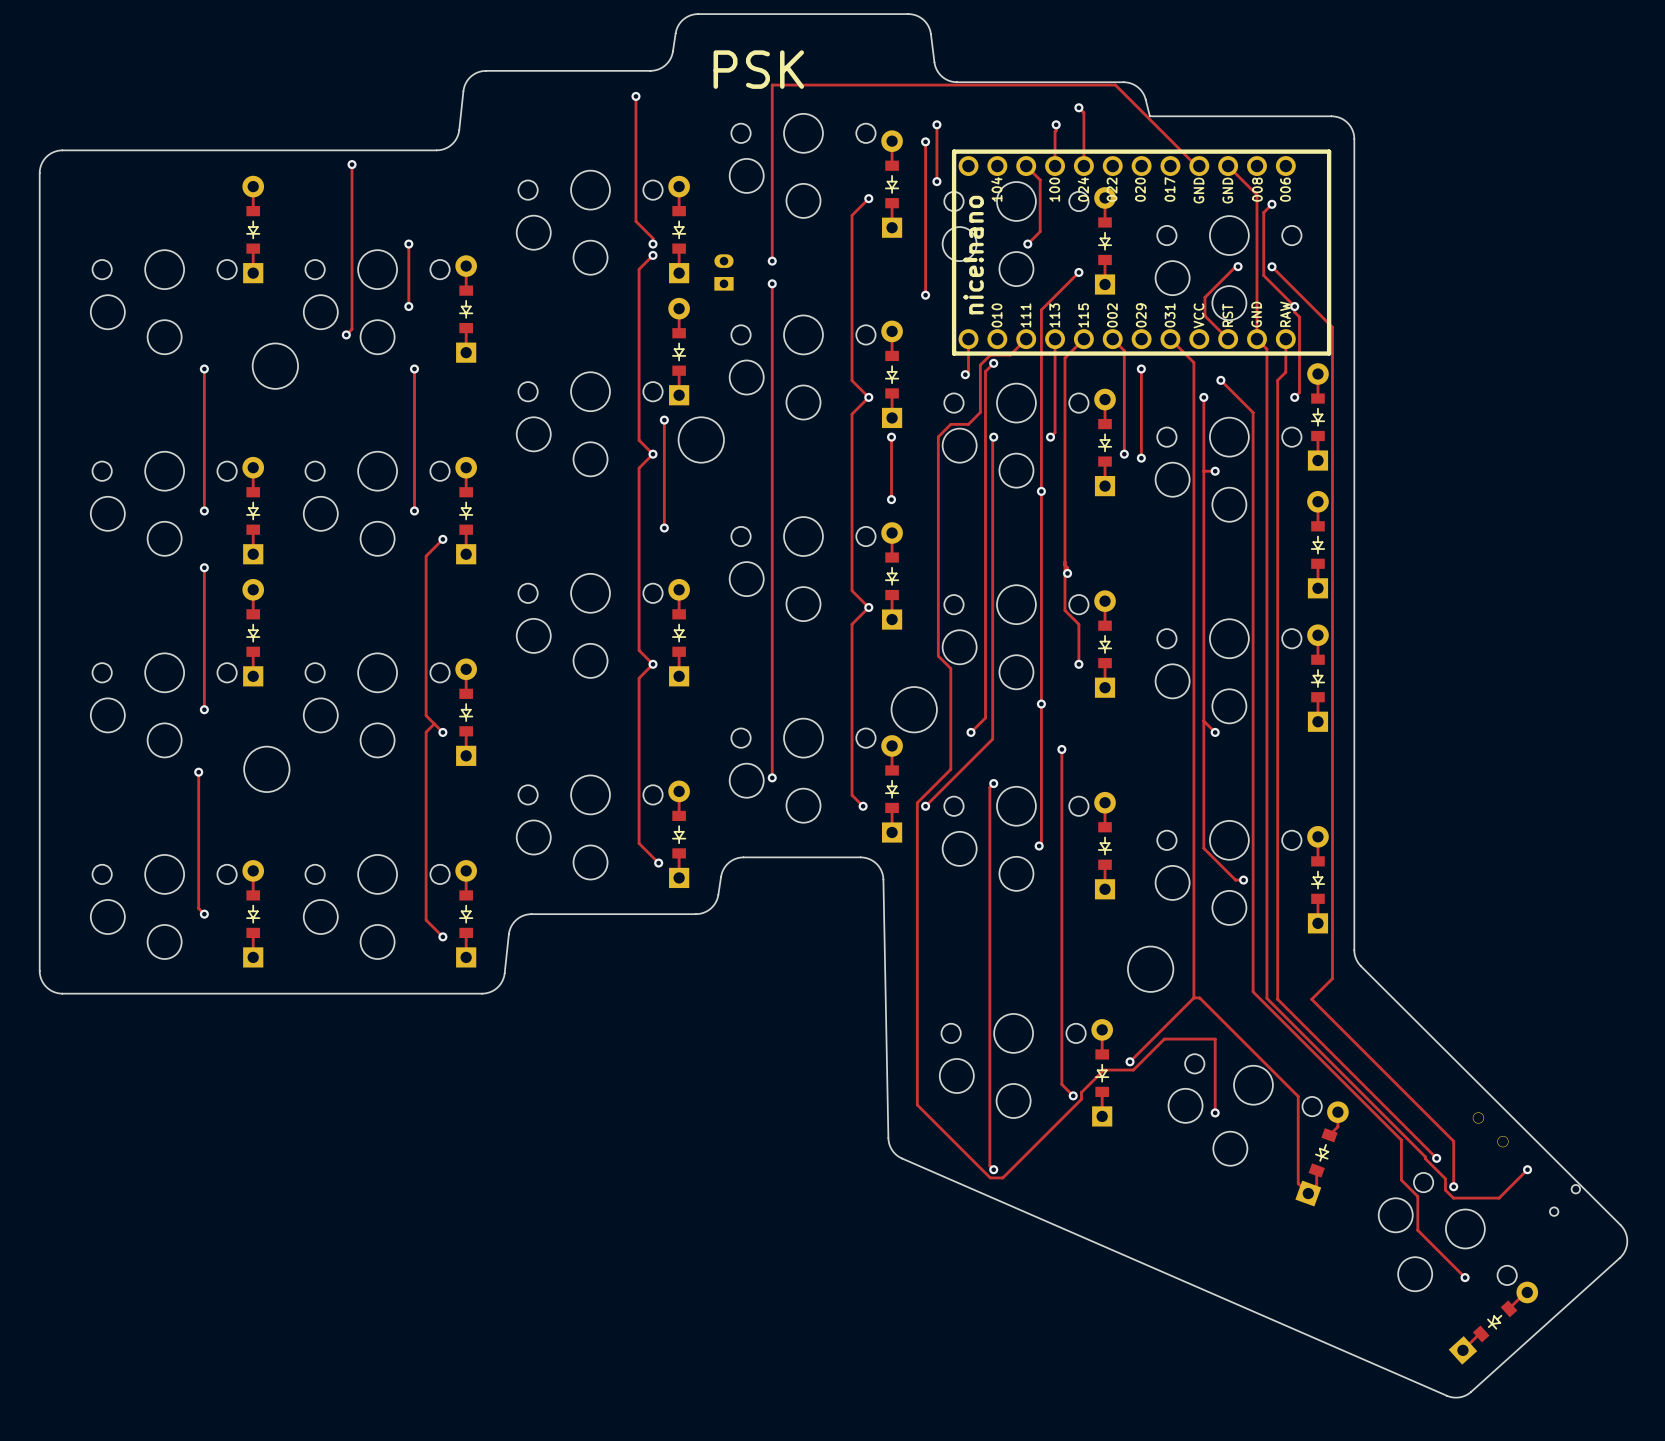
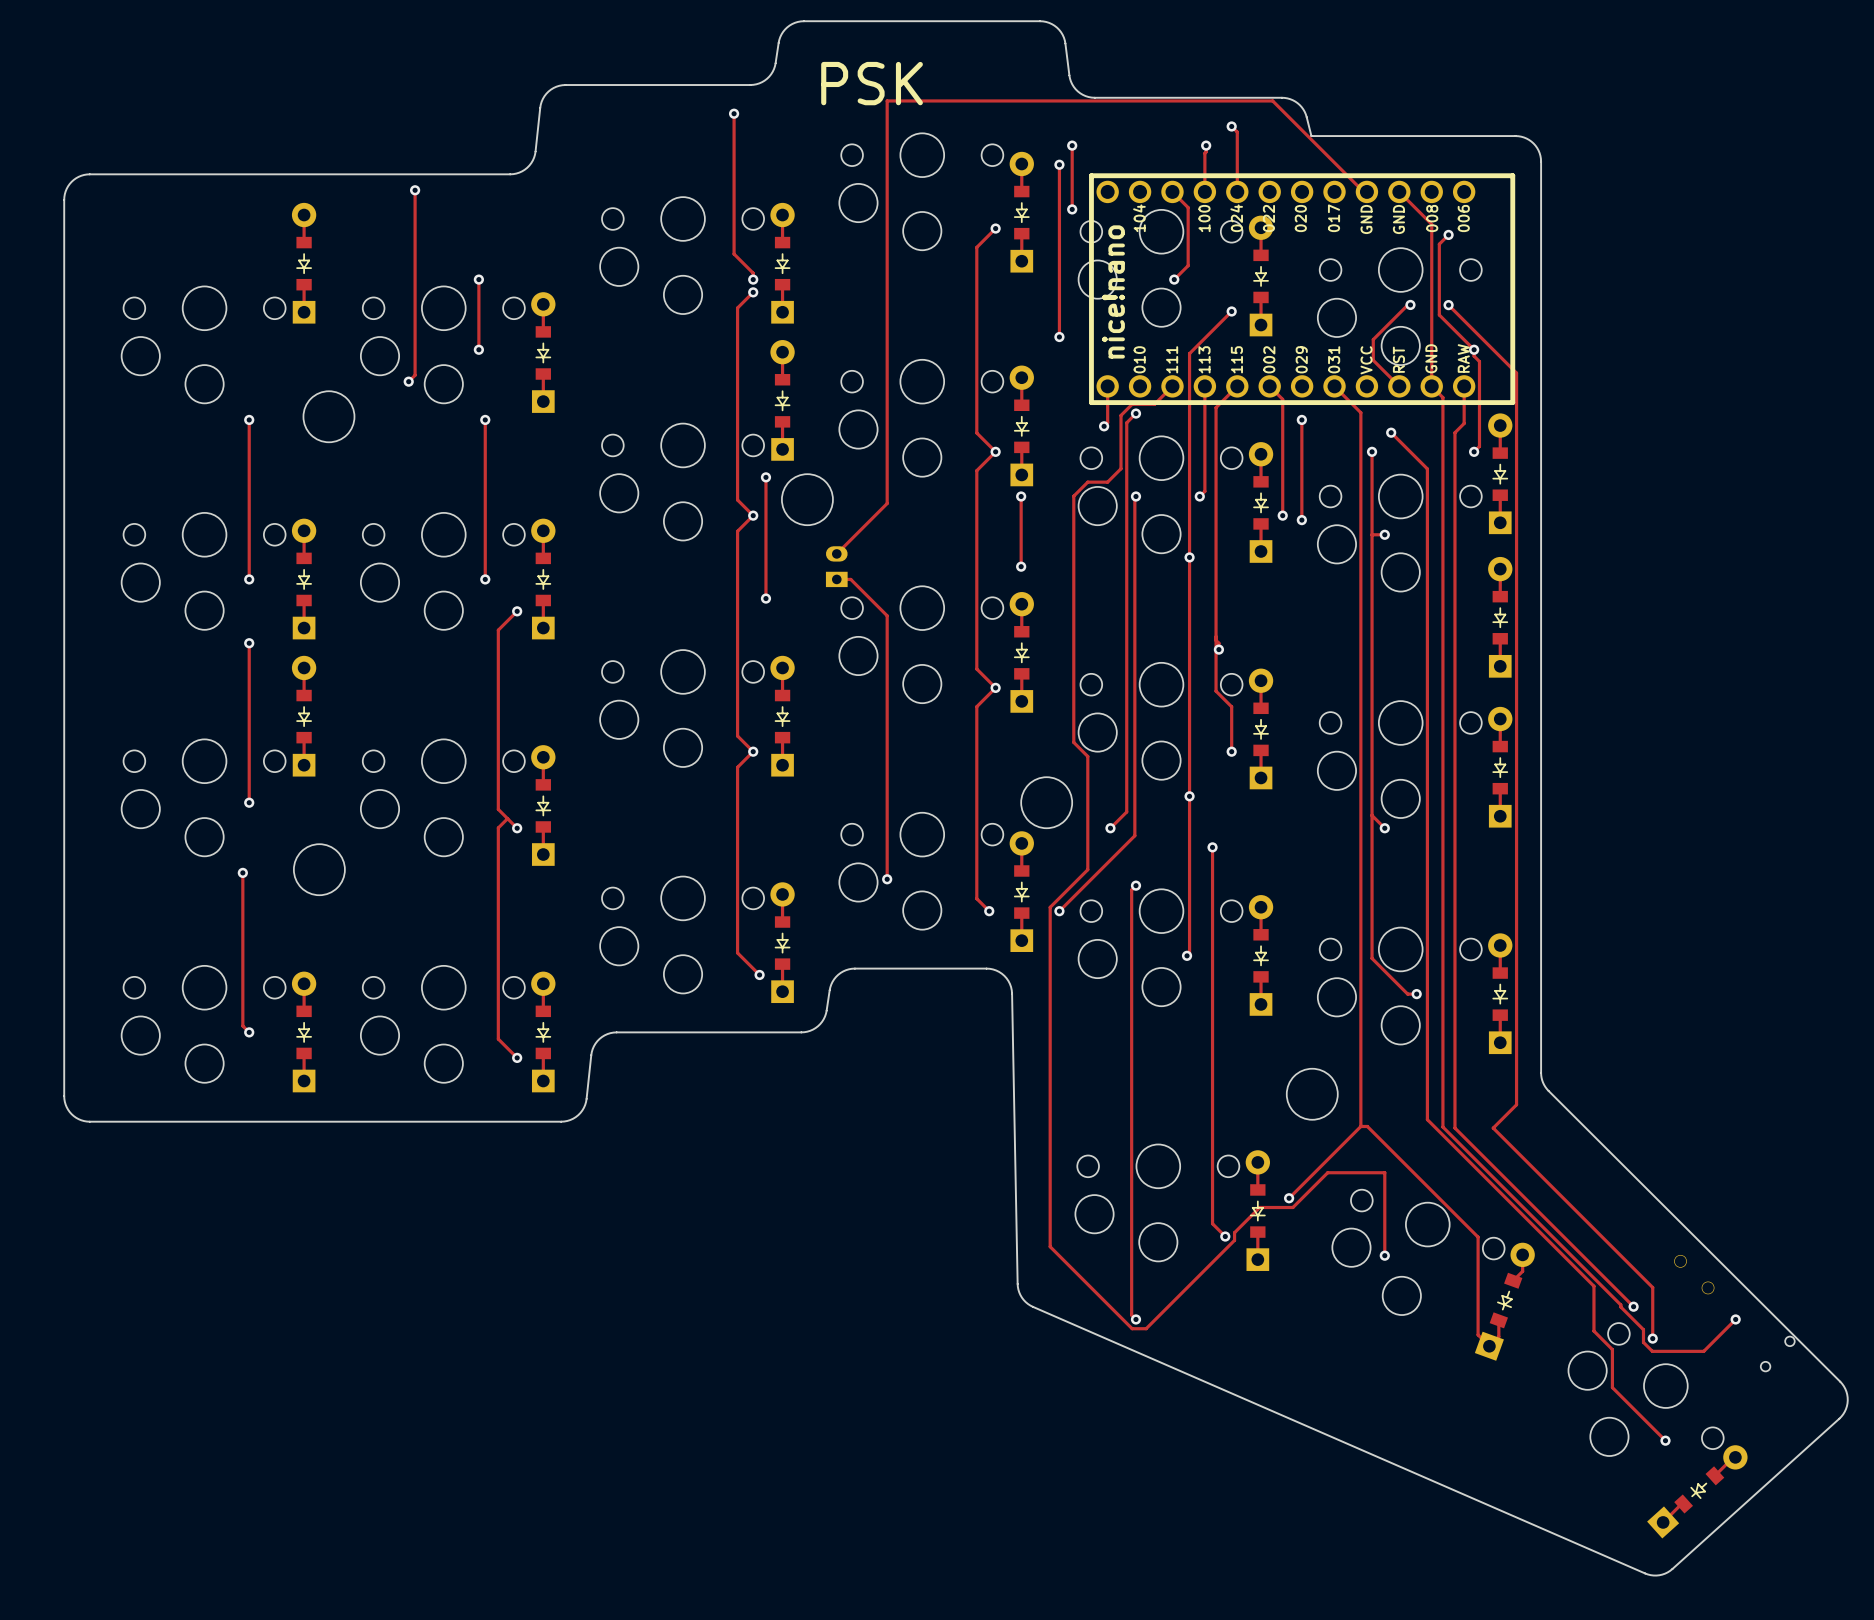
track: none -> (887, 298) (887, 324)
via: (772, 261) -> none
part position: (723, 272) -> (836, 566)
via: (772, 283) -> none
track: (772, 443) (772, 543) -> (887, 503) (836, 553)
track: none -> (836, 579) (850, 579) (887, 615)

